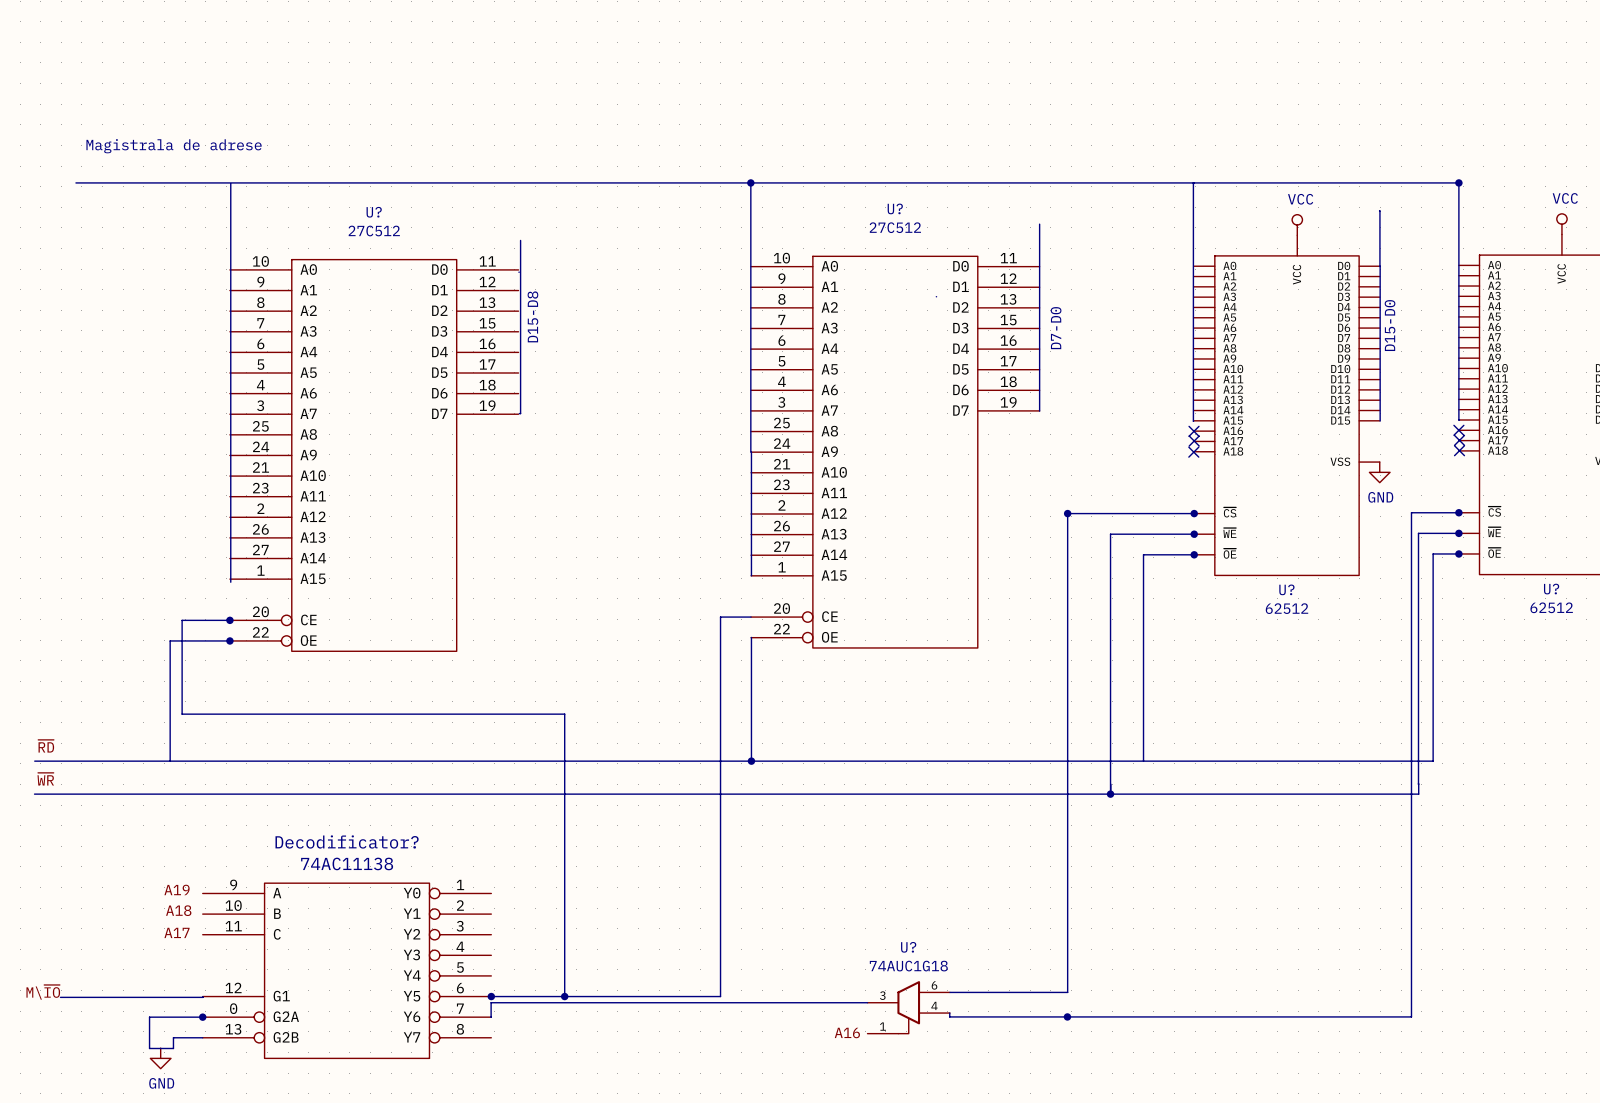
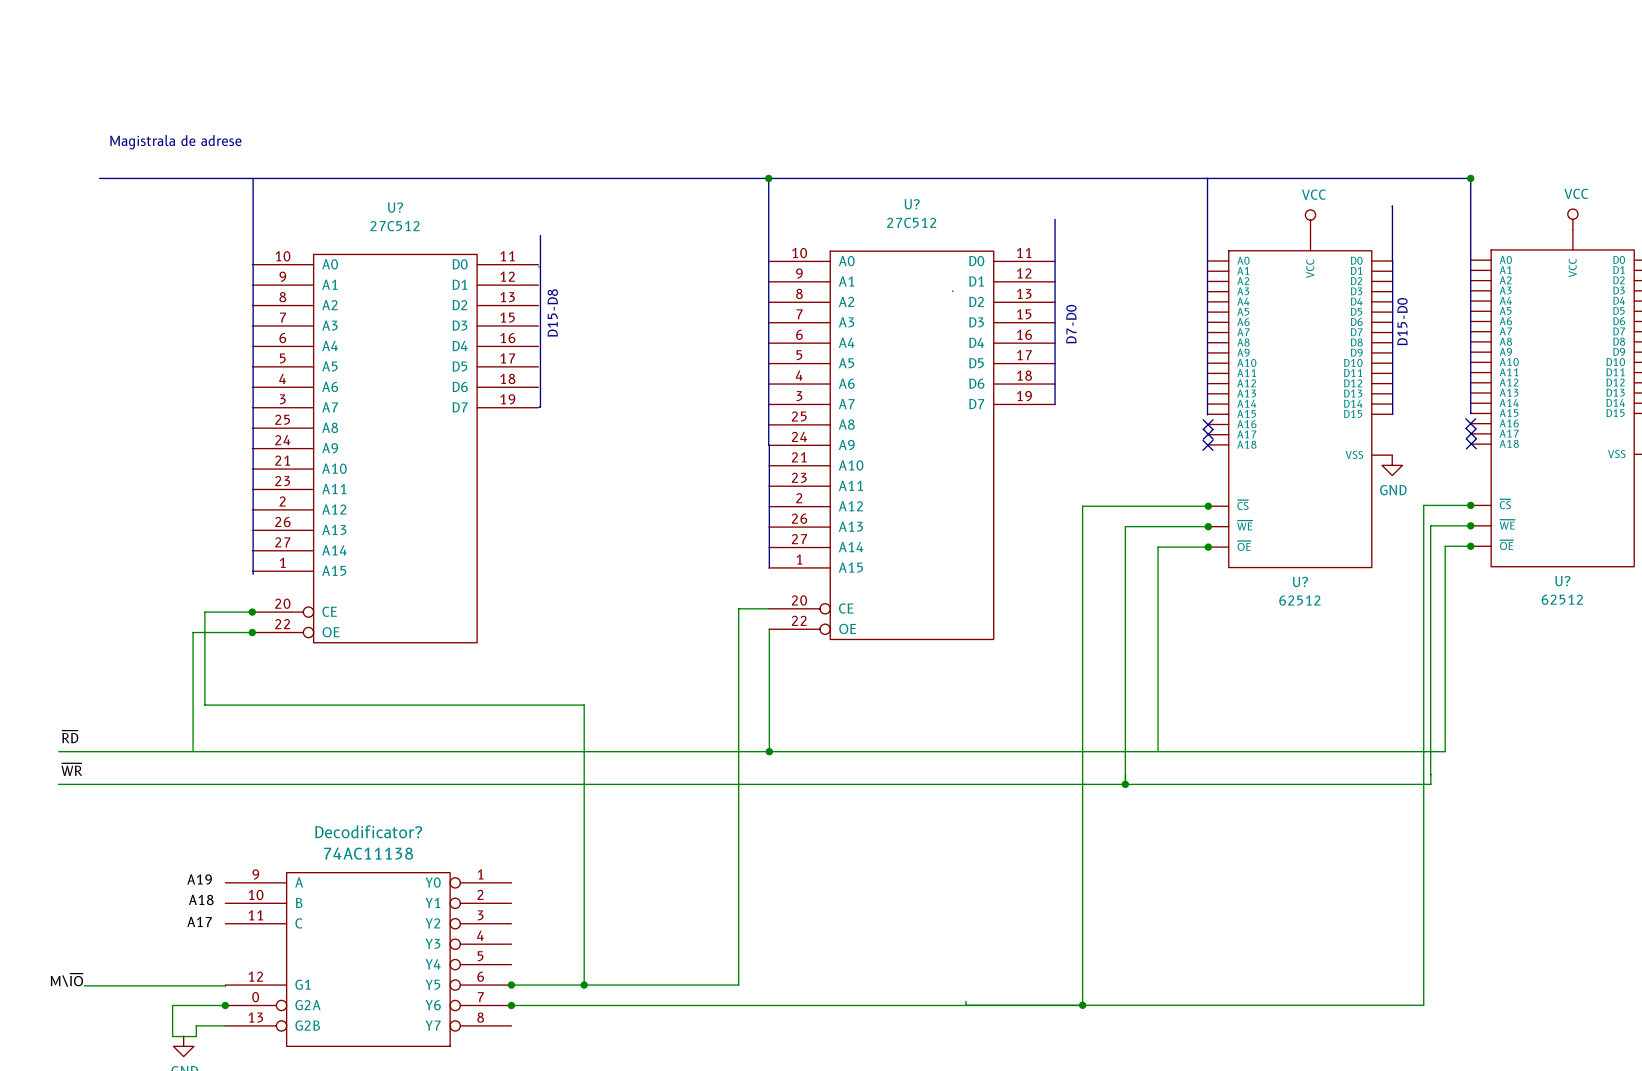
wire: (1067, 513) (1067, 992) (949, 992) -> (1082, 506) (1082, 1005)
junction: (1067, 513) -> none
wire: (867, 1002) (491, 1002) (491, 1016) -> (1082, 1005) (511, 1005)
U?: 74AUC1G18 (908, 1007) -> none
junction: none -> (511, 1005)
label: A16 (847, 1032) -> none

